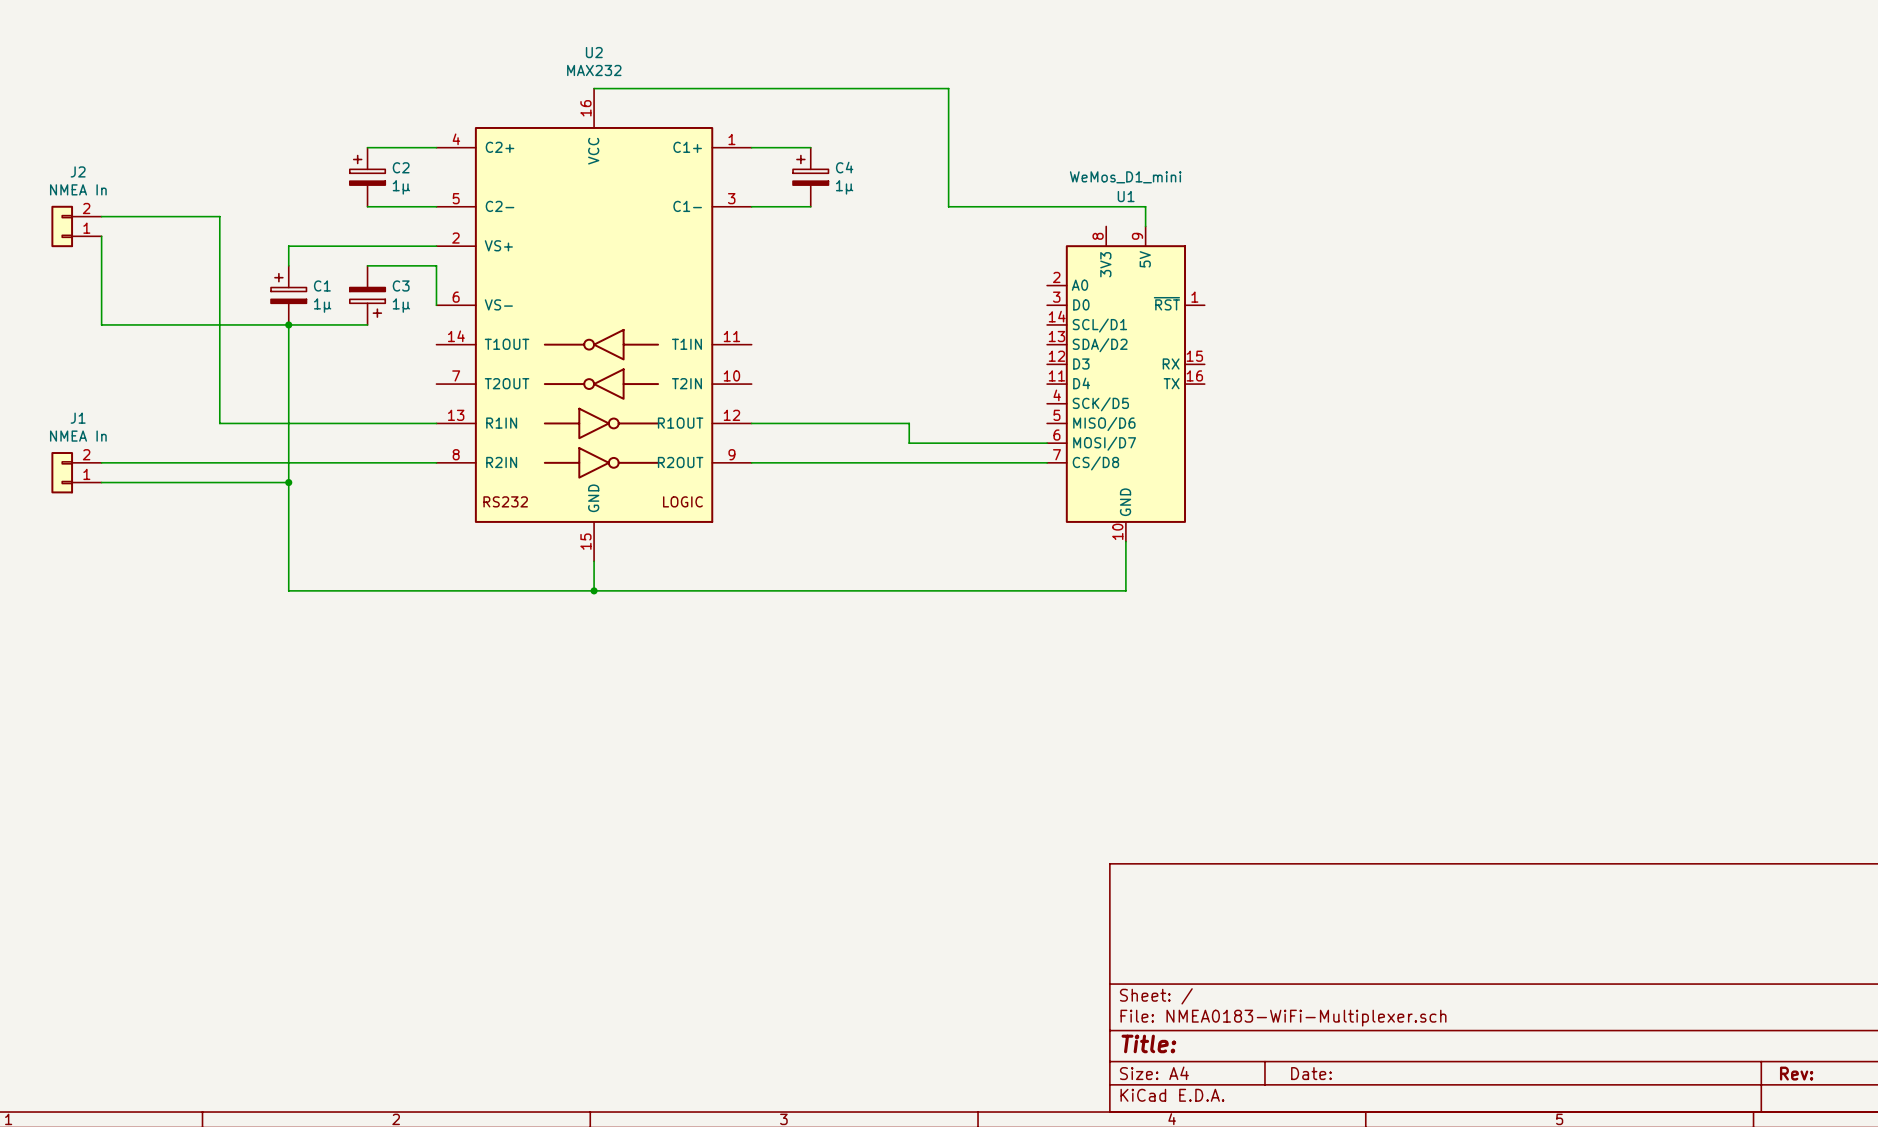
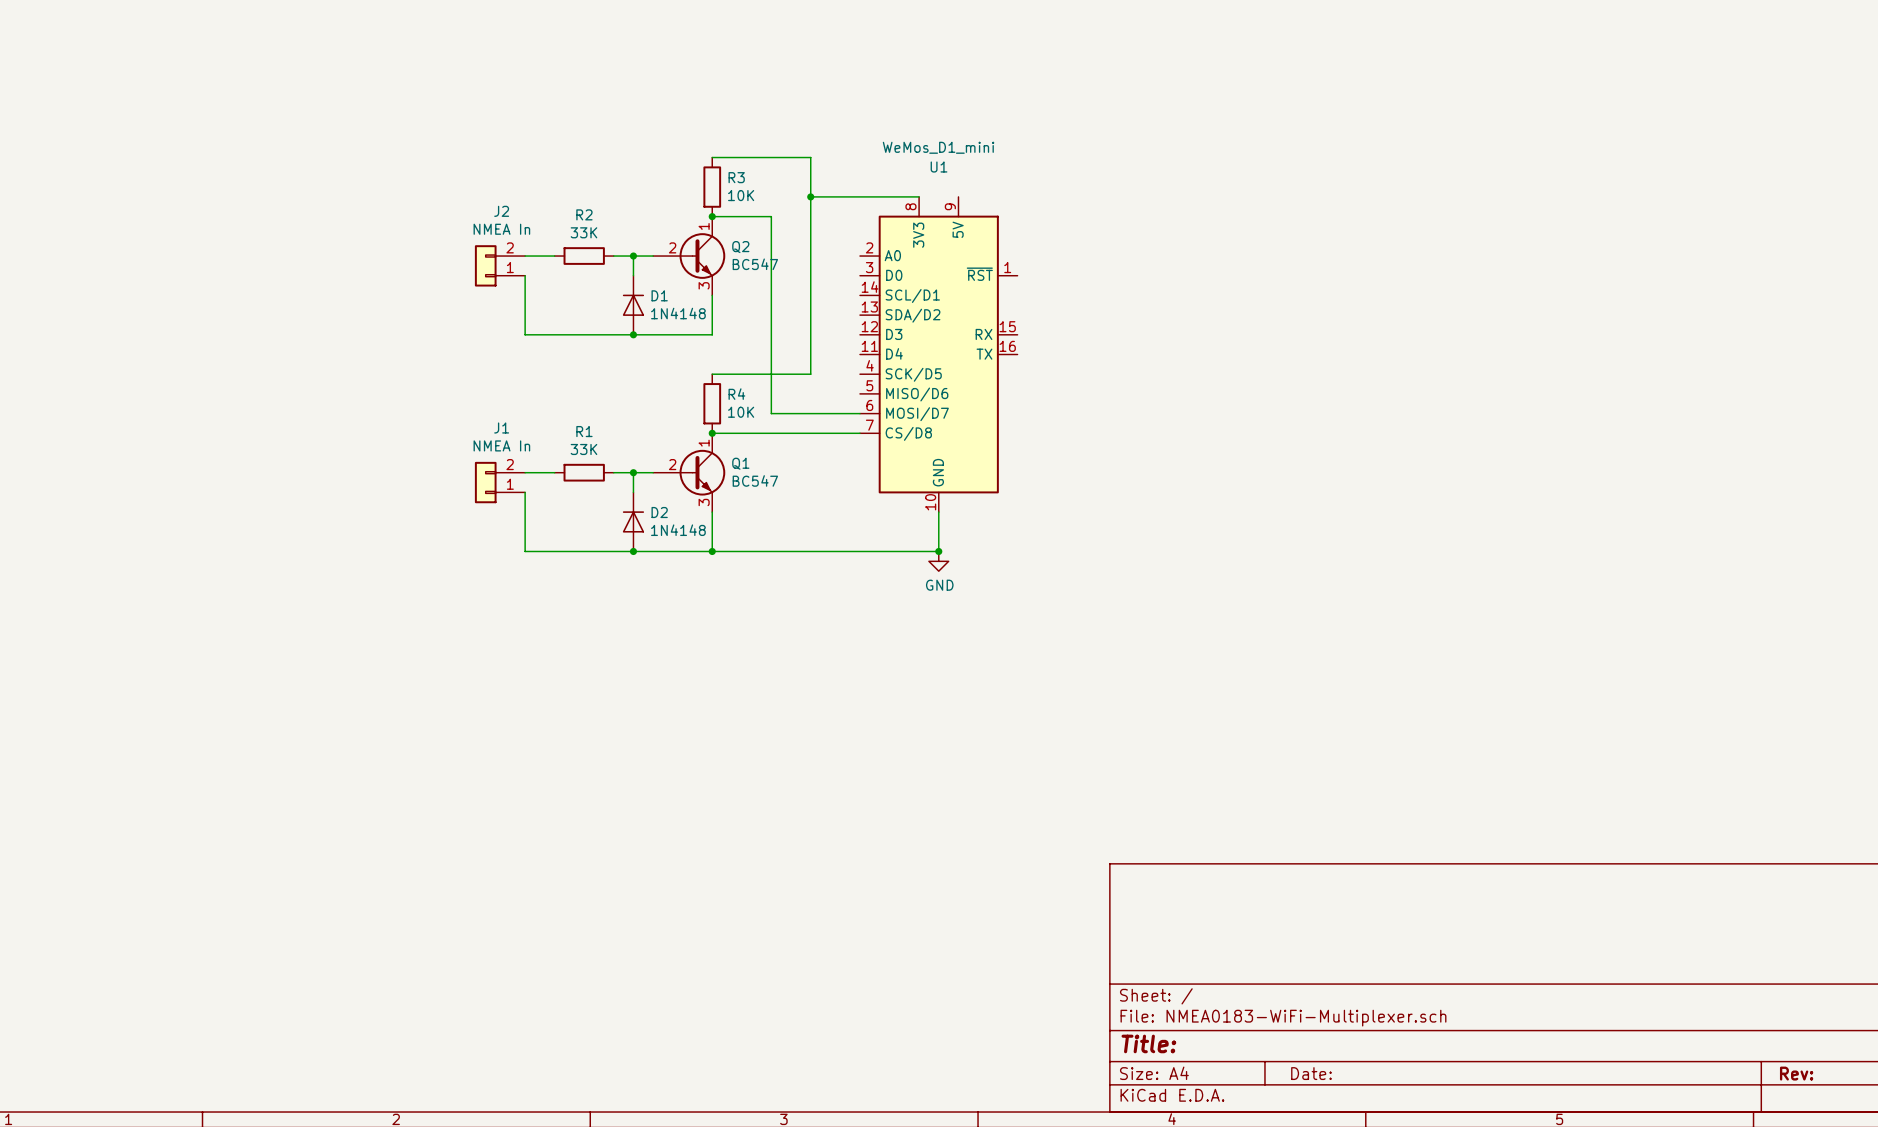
wire: (594, 88) (948, 88) (948, 206) (1145, 206) (1145, 226) -> none
wire: (367, 147) (436, 147) -> none
wire: (751, 147) (810, 147) -> none
wire: none -> (712, 157) (810, 157) (810, 374) (712, 374)
C2: 1µ (367, 177) -> none
C4: 1µ (810, 177) -> none
R3: none -> 10K (712, 187)
wire: none -> (810, 196) (919, 196)
junction: none -> (810, 196)
wire: (367, 206) (436, 206) -> none
wire: (751, 206) (810, 206) -> none
wire: (101, 216) (219, 216) (219, 423) (436, 423) -> none
wire: none -> (712, 216) (771, 216) (771, 413) (859, 413)
junction: none -> (712, 216)
J2 position: (76, 226) -> (500, 265)
wire: (101, 236) (101, 324) (367, 324) -> none
wire: (436, 246) (288, 246) (288, 265) -> none
R2: none -> 33K (584, 256)
junction: none -> (633, 256)
Q2: none -> BC547 (689, 256)
wire: (367, 265) (436, 265) (436, 305) -> none
C1: 1µ (288, 295) -> none
C3: 1µ (367, 295) -> none
D1: none -> 1N4148 (633, 305)
wire: (288, 324) (288, 590) (1125, 590) (1125, 541) -> none
junction: (288, 324) -> none
U2: MAX232 (594, 324) -> none
junction: none -> (633, 334)
U1 position: (1125, 384) -> (938, 354)
R4: none -> 10K (712, 403)
wire: (751, 423) (909, 423) (909, 443) (1047, 443) -> none
wire: none -> (712, 433) (859, 433)
junction: none -> (712, 433)
wire: (101, 462) (436, 462) -> none
wire: (751, 462) (1047, 462) -> none
J1 position: (76, 472) -> (500, 482)
R1: none -> 33K (584, 472)
junction: none -> (633, 472)
Q1: none -> BC547 (689, 472)
wire: (101, 482) (288, 482) -> none
junction: (288, 482) -> none
wire: none -> (525, 492) (525, 551) (938, 551) (938, 512)
wire: none -> (712, 512) (712, 551)
D2: none -> 1N4148 (633, 521)
junction: none -> (633, 551)
junction: none -> (712, 551)
junction: none -> (938, 551)
wire: (594, 561) (594, 590) -> none
power symbol: none -> GND (938, 561)
junction: (594, 590) -> none

